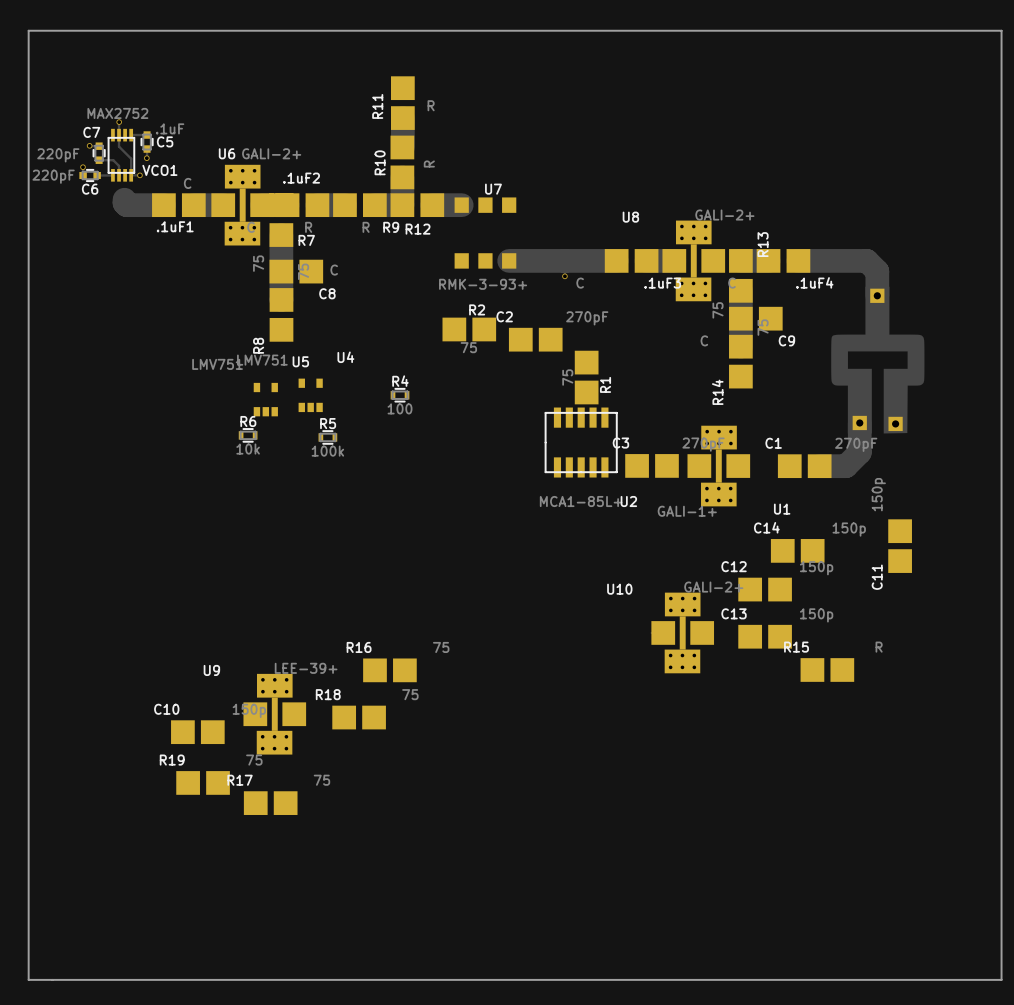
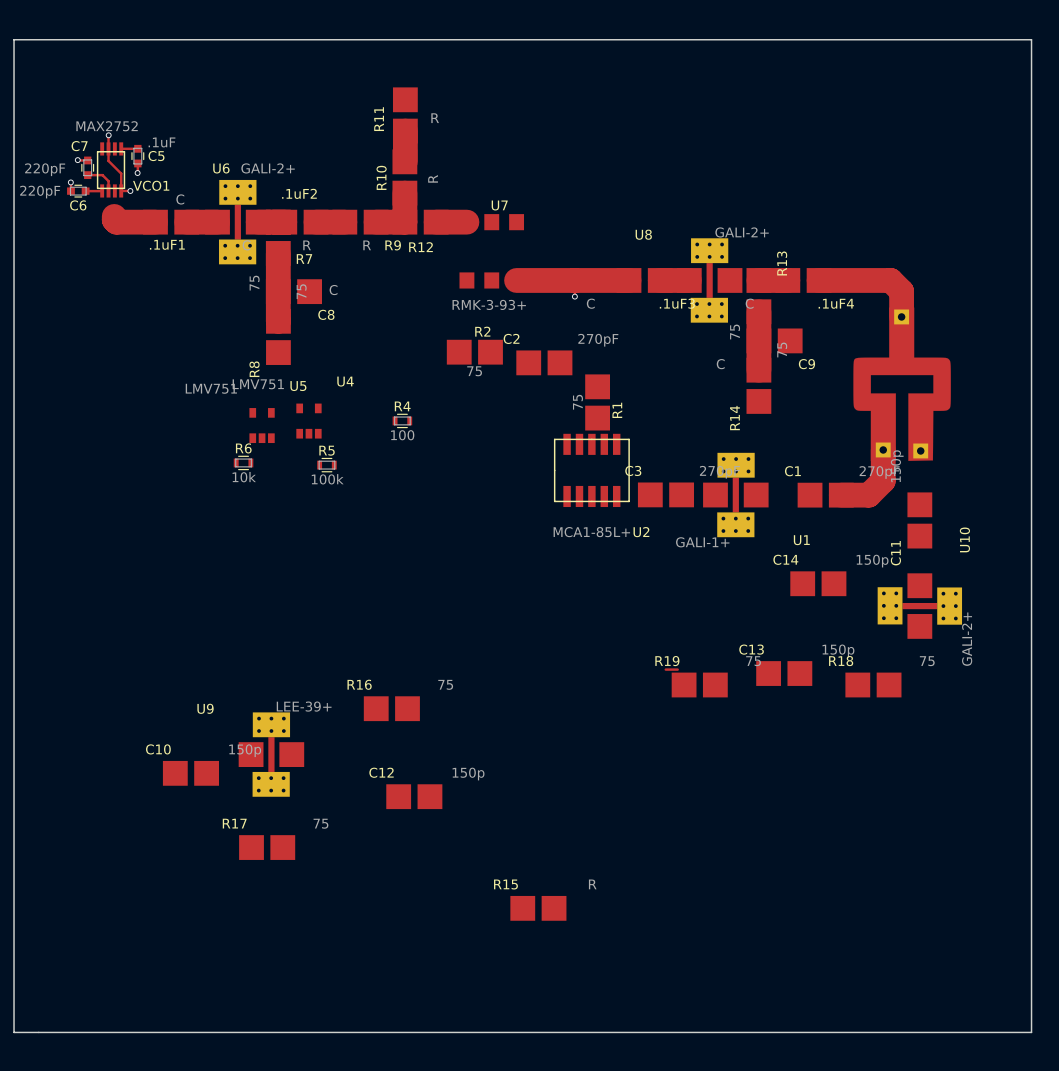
C11 position: (900, 546) -> (919, 520)
C12 position: (765, 589) -> (414, 796)
U10 rotation: 0° (682, 632) -> 90° clockwise (919, 606)
U10 position: (682, 632) -> (919, 606)
R15 position: (827, 670) -> (538, 908)
R18 position: (359, 717) -> (873, 685)
R19 position: (203, 782) -> (699, 685)

